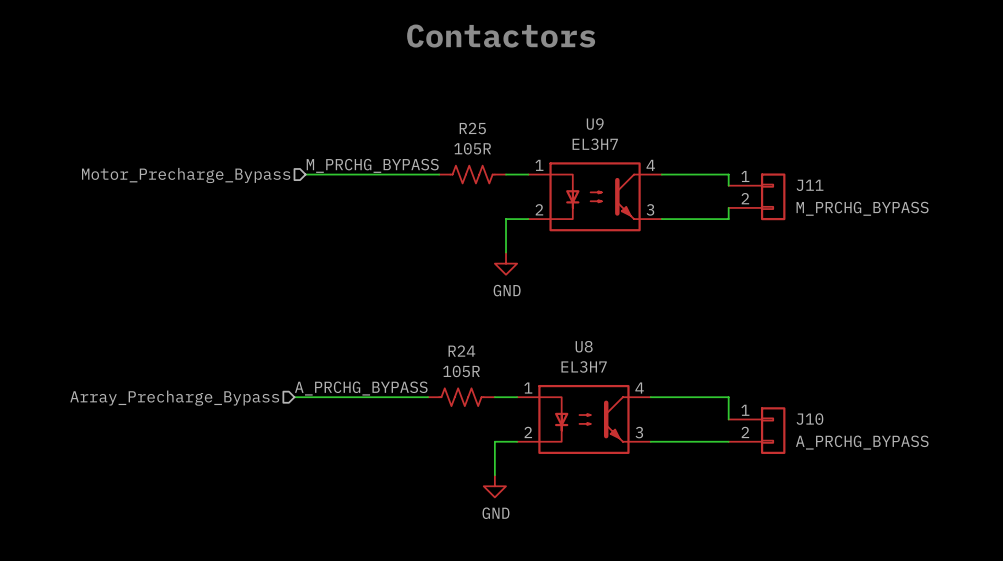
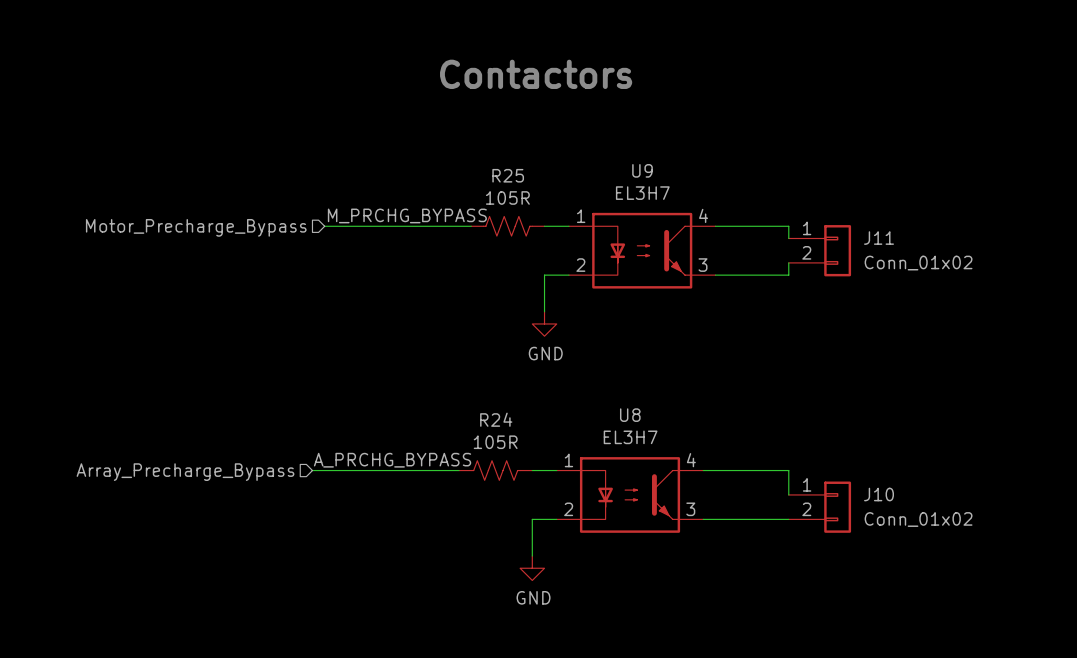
J11 value: M_PRCHG_BYPASS (862, 208) -> Conn_01x02 (918, 263)
J10 value: A_PRCHG_BYPASS (862, 442) -> Conn_01x02 (918, 519)

